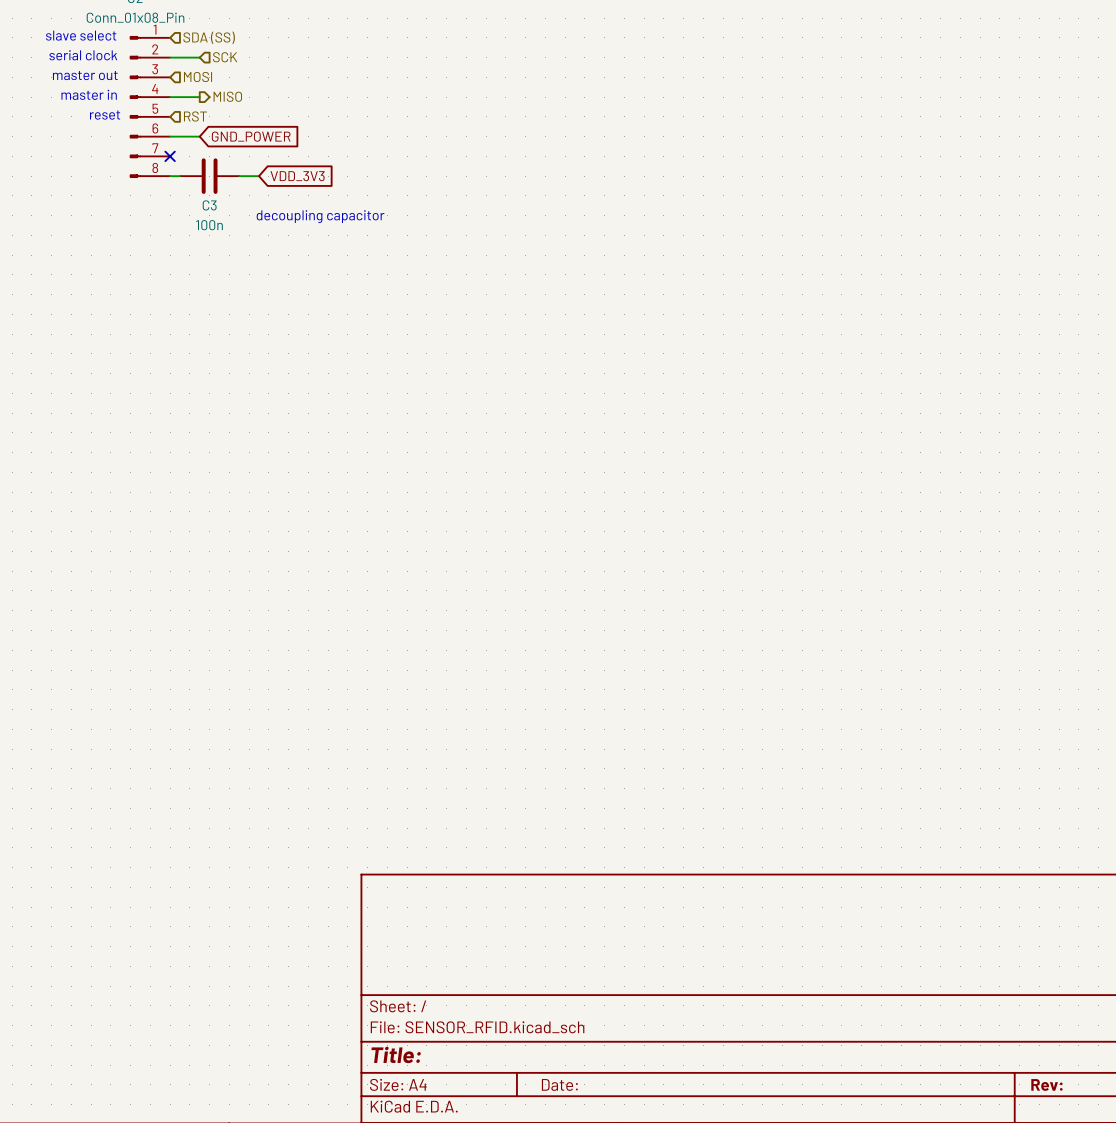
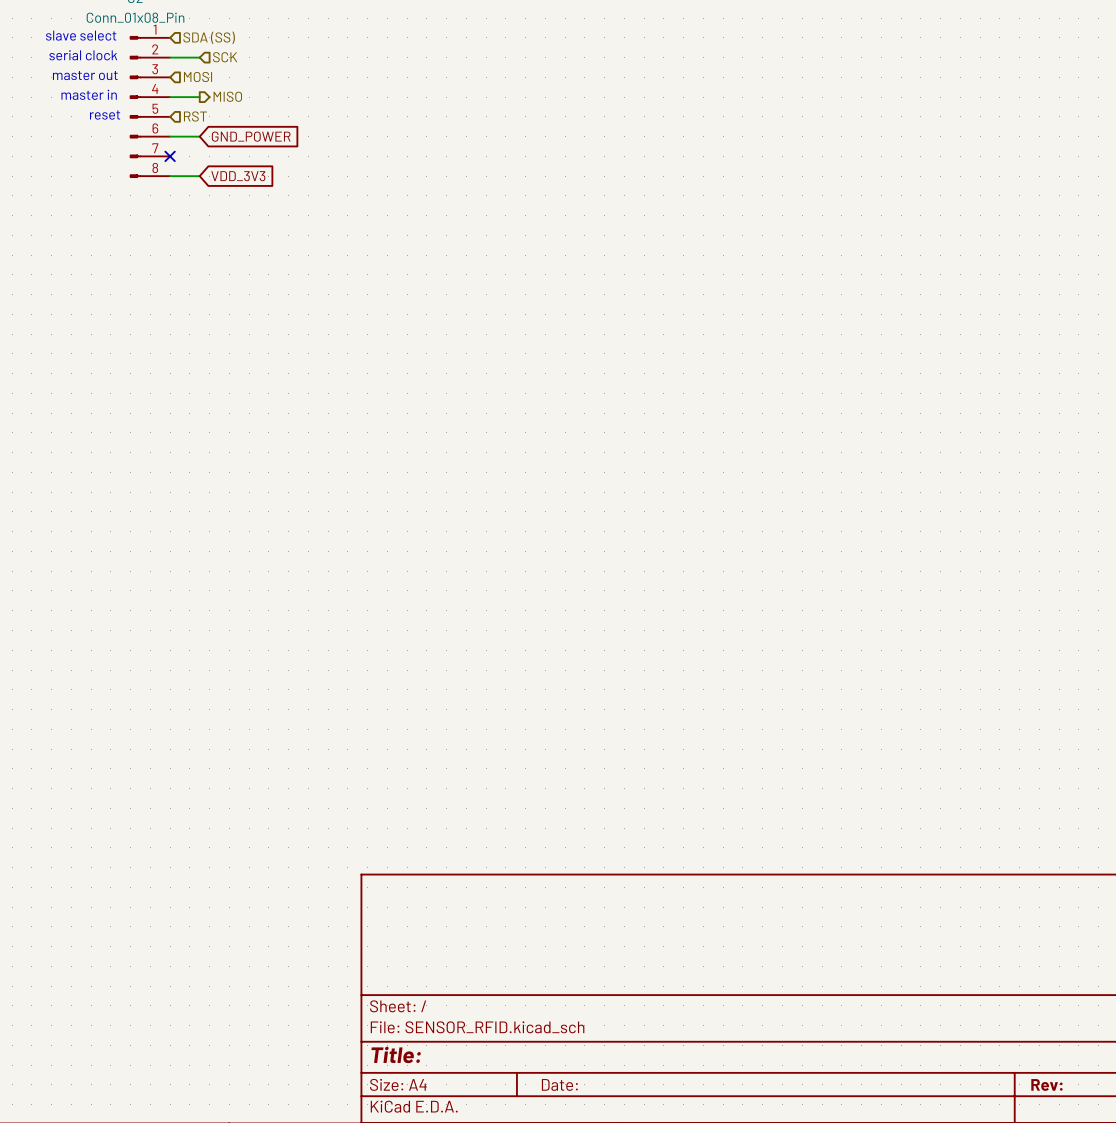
C3: 100n (209, 176) -> none
global label position: VDD_3V3 (297, 176) -> VDD_3V3 (238, 176)
text: decoupling capacitor (320, 216) -> none

